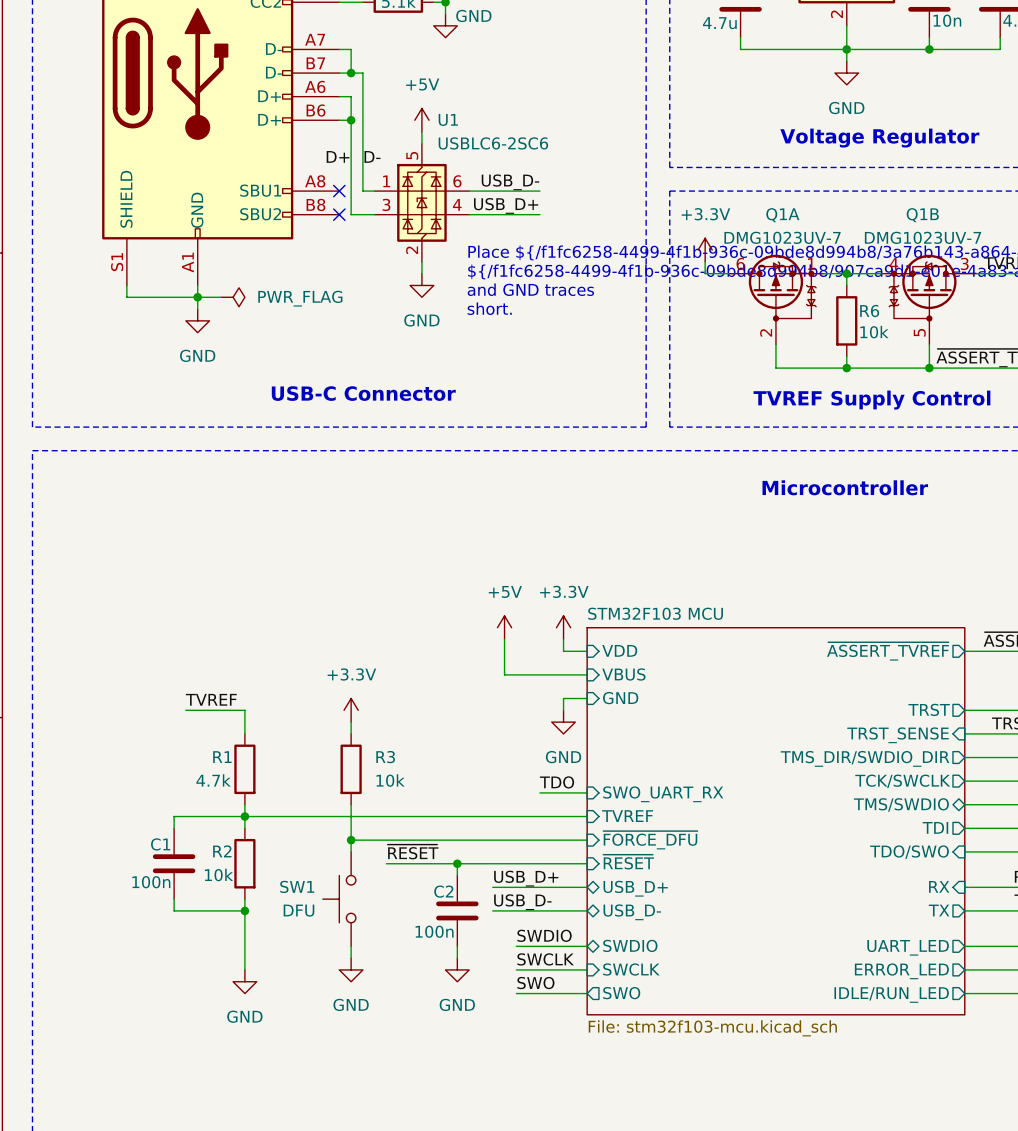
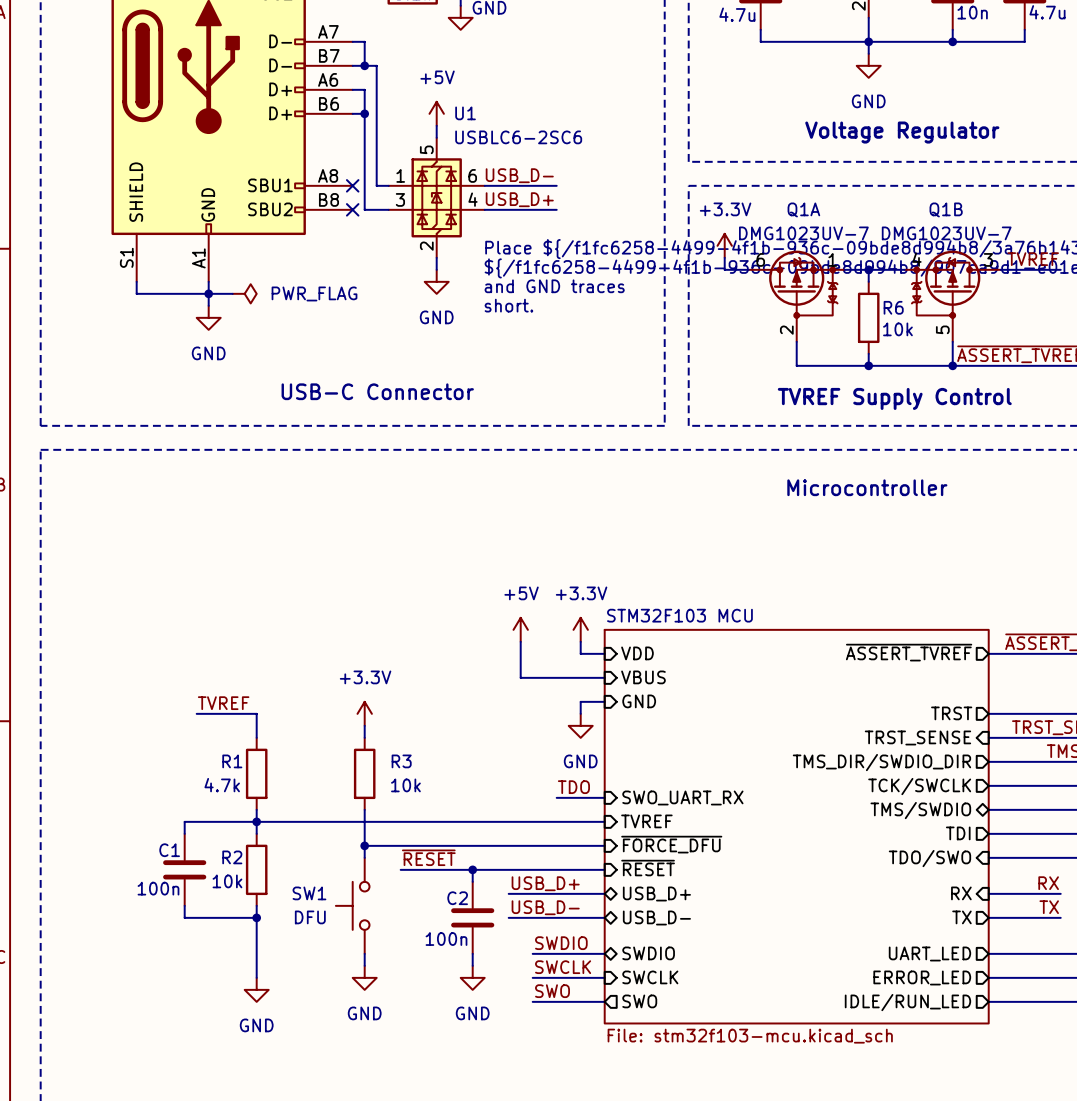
label: D+ (338, 156) -> none
label: D- (372, 156) -> none

